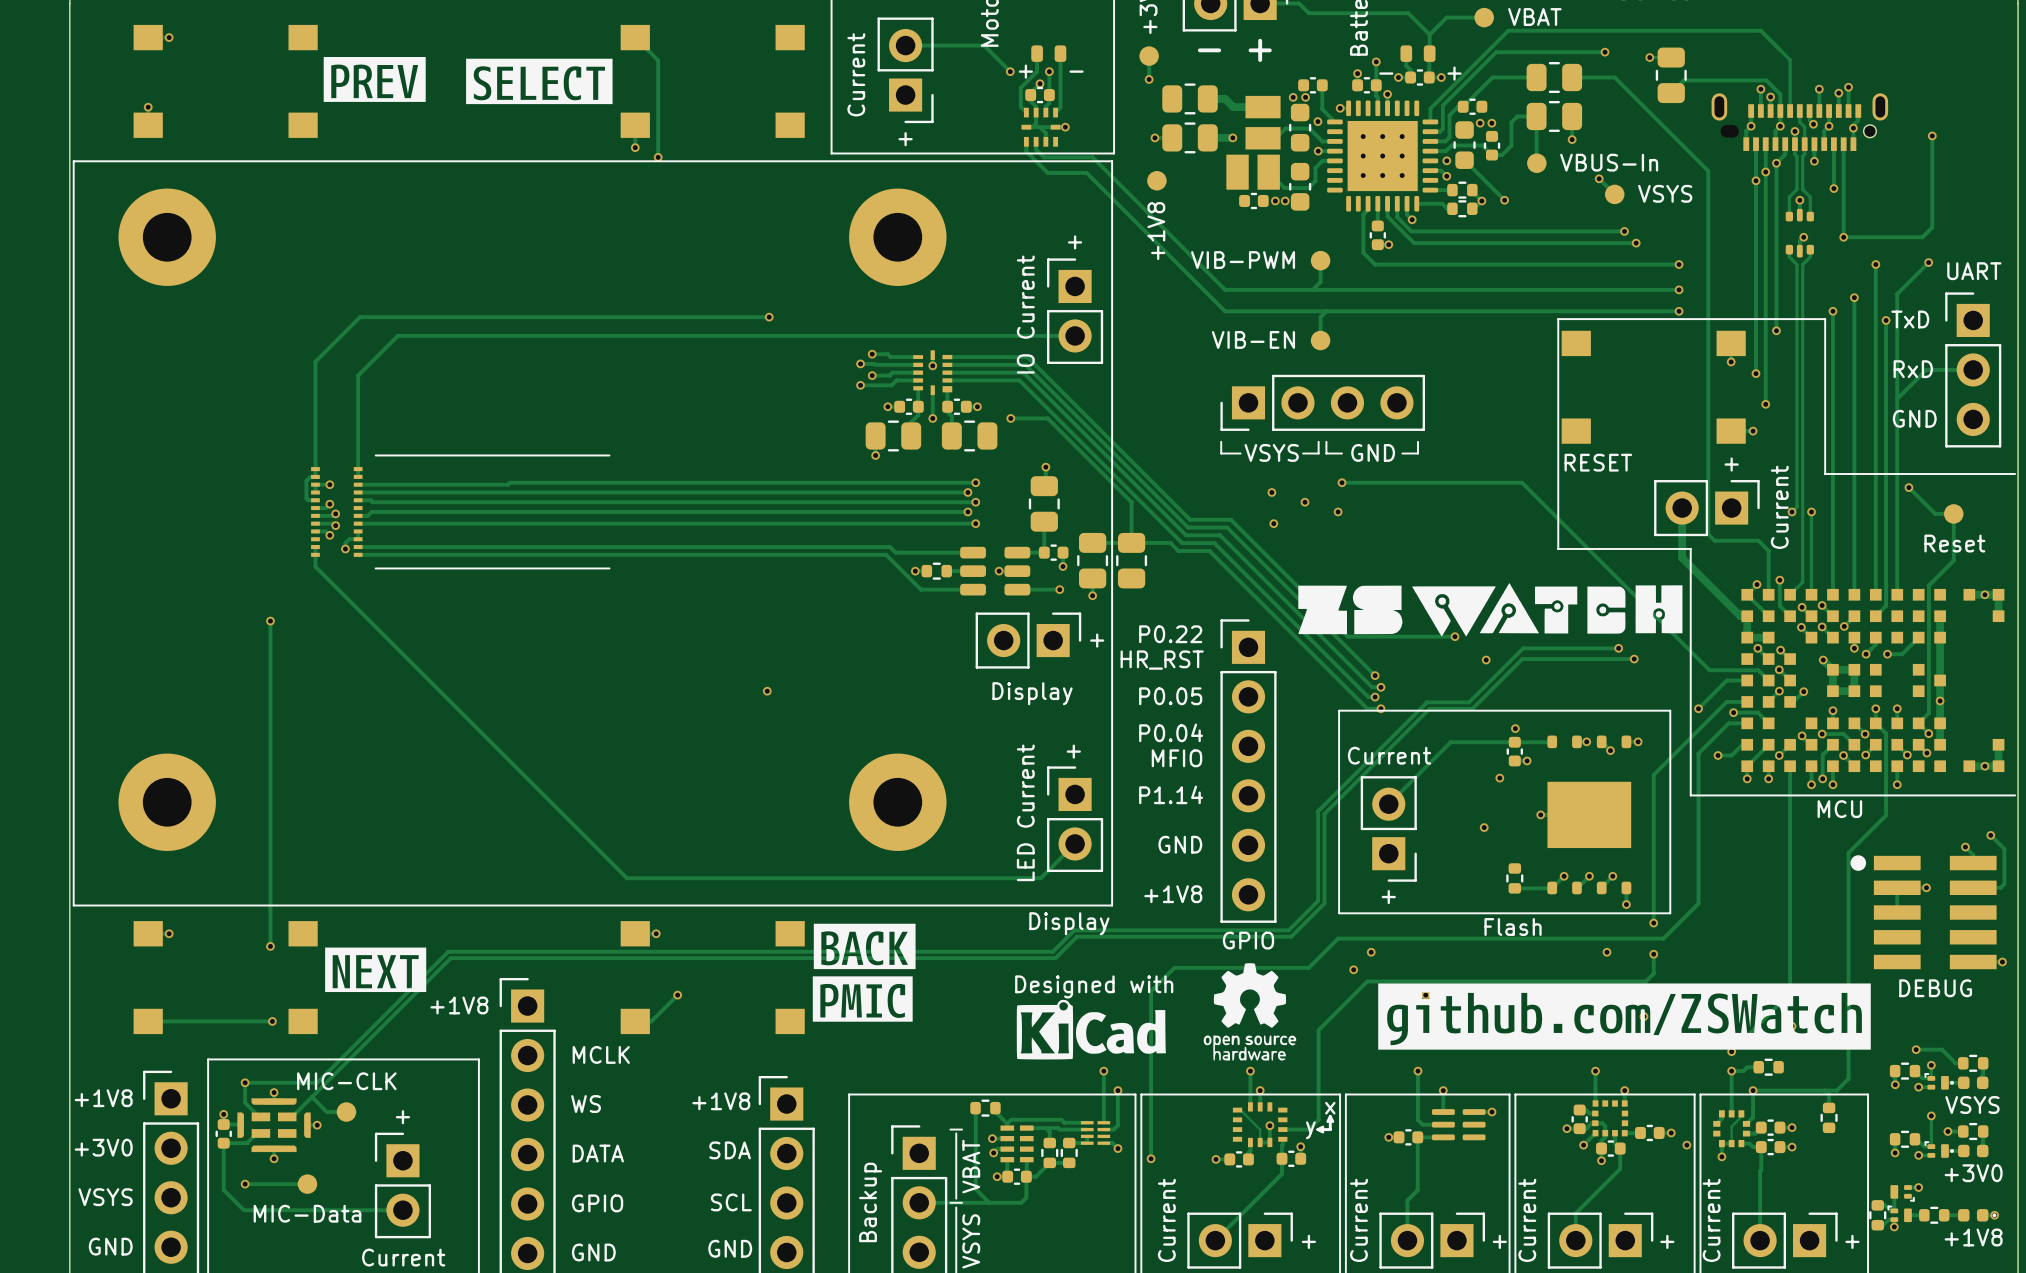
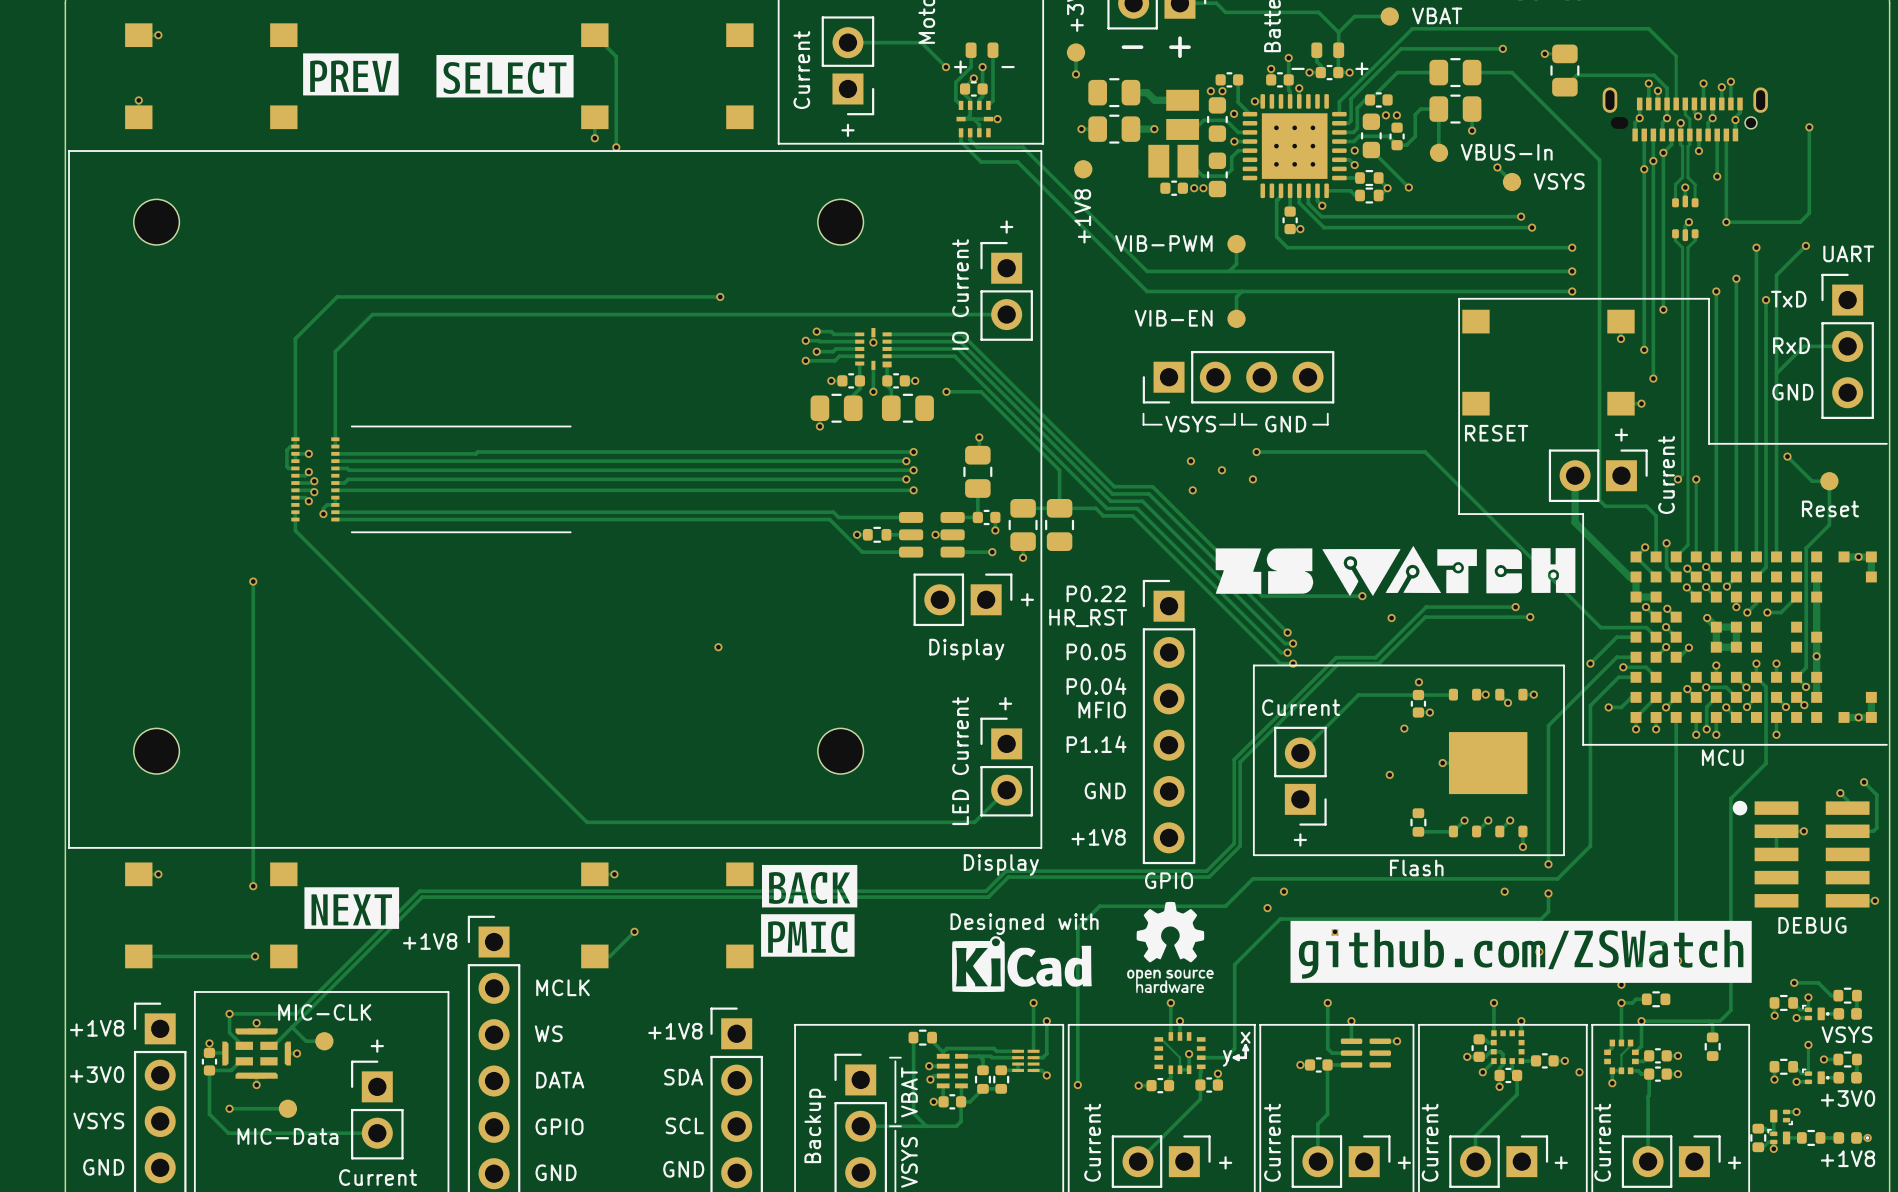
part footprint: [118, 188, 216, 286] -> [133, 199, 180, 245]
part footprint: [849, 188, 947, 286] -> [817, 199, 864, 245]
part footprint: [118, 753, 216, 851] -> [133, 728, 180, 775]
part footprint: [849, 753, 947, 851] -> [817, 728, 864, 775]

